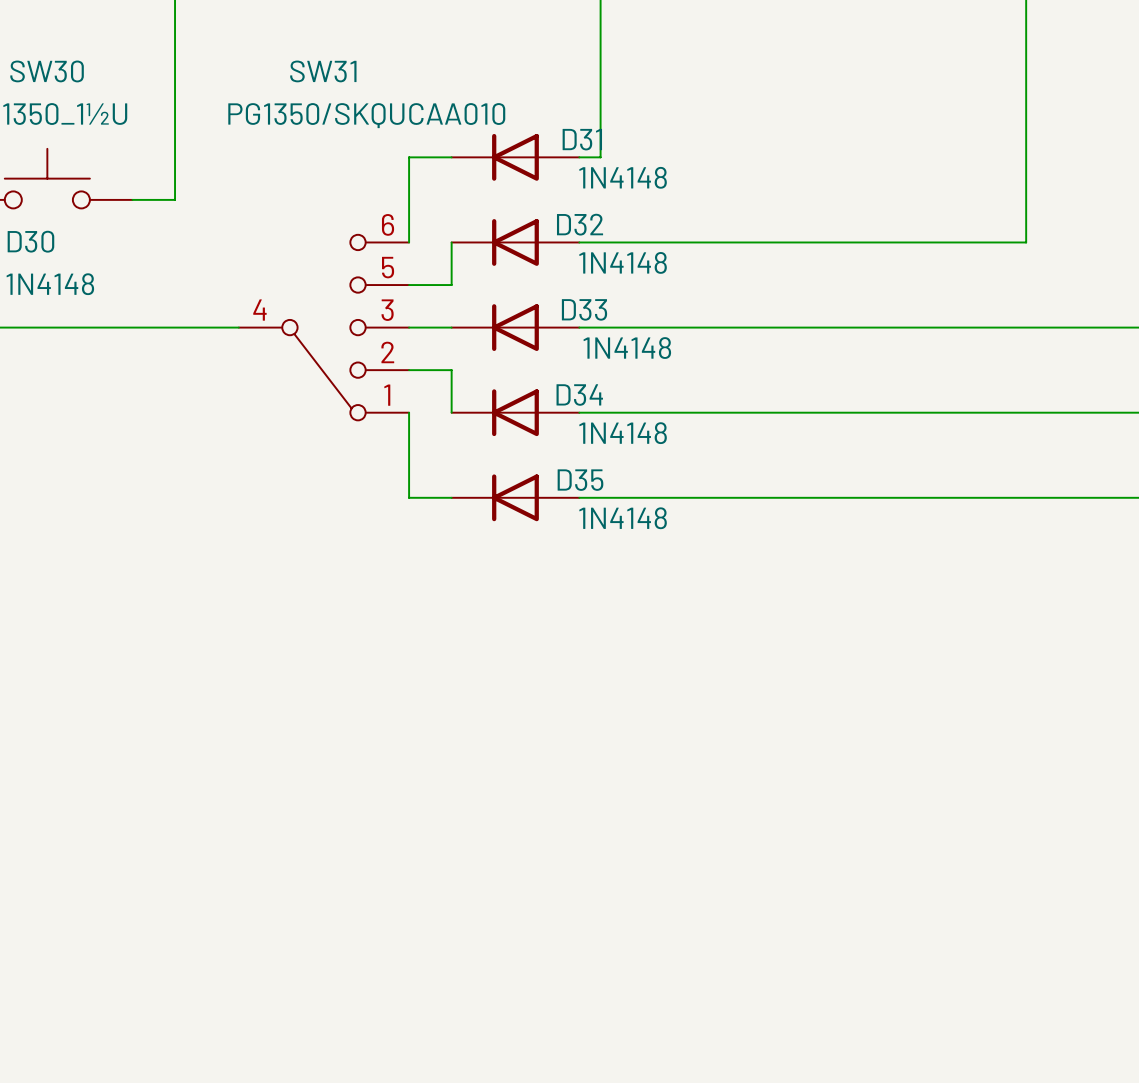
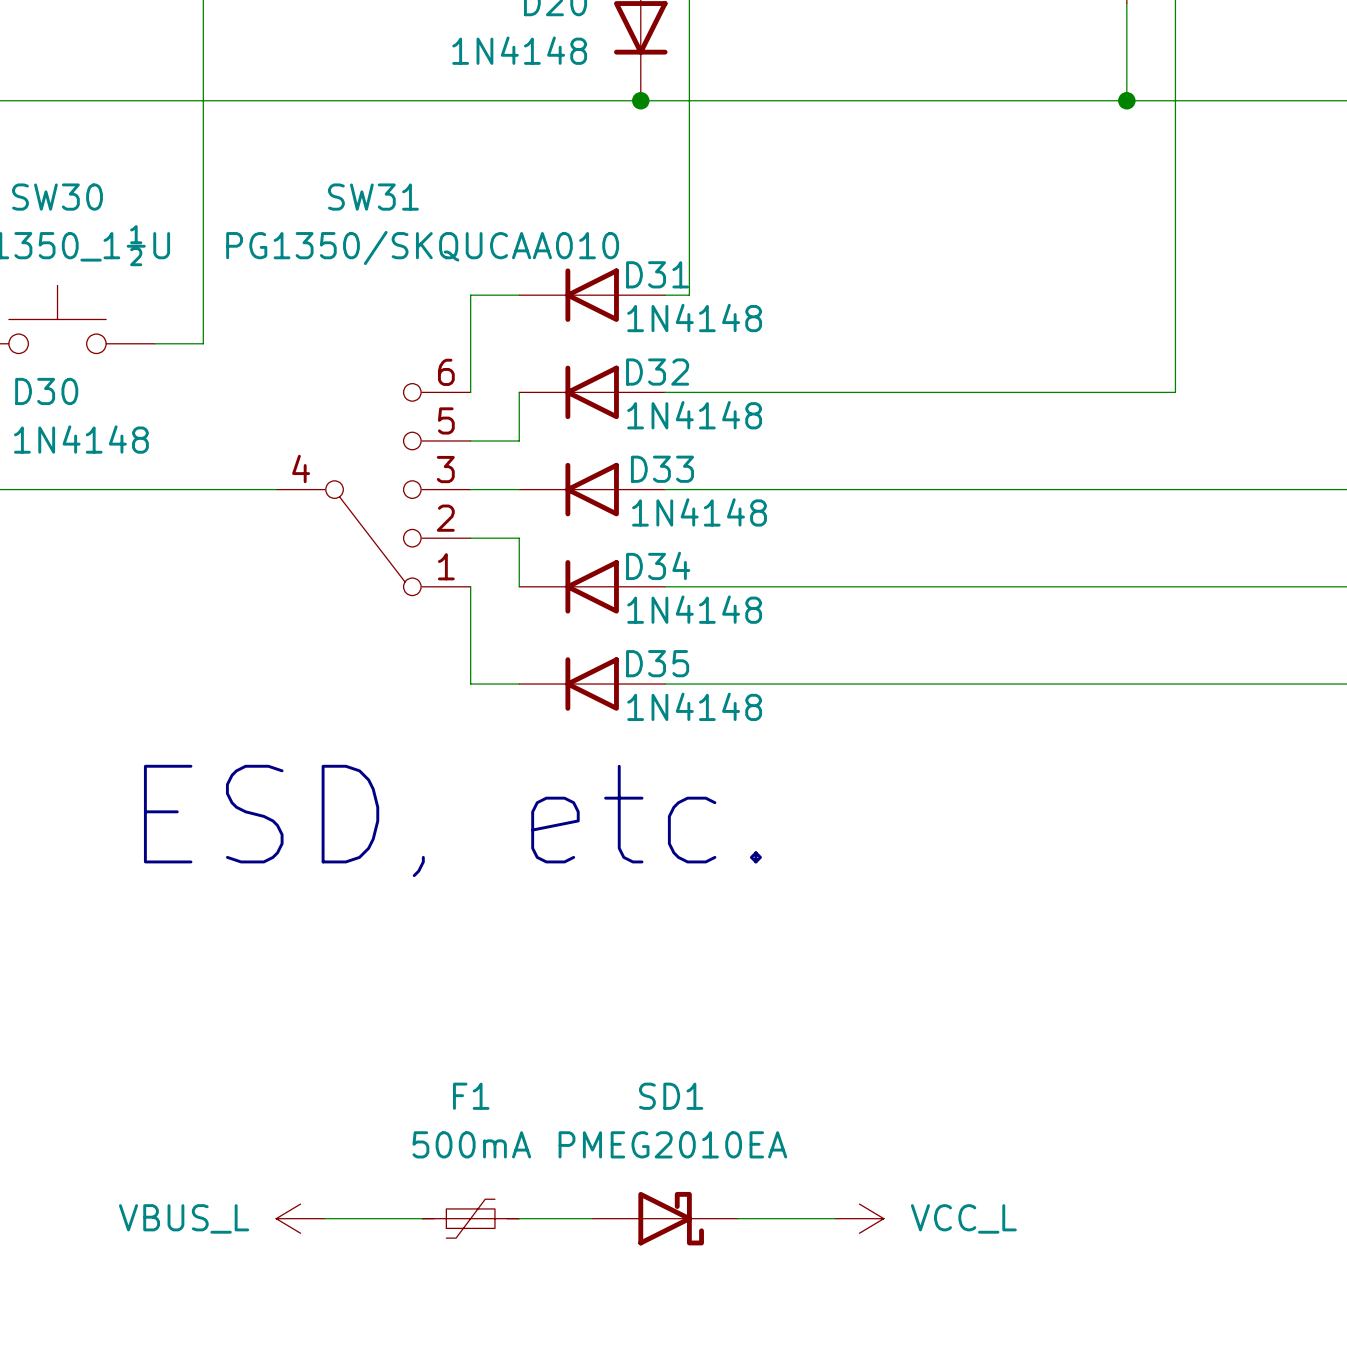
text: none -> ESD, etc. (452, 820)
power symbol: none -> VBUS_L (300, 1218)
wire: none -> (324, 1218) (422, 1218)
F1: none -> 500mA (470, 1218)
wire: none -> (519, 1218) (592, 1218)
SD1: none -> PMEG2010EA (665, 1218)
wire: none -> (737, 1218) (835, 1218)
power symbol: none -> VCC_L (859, 1218)

